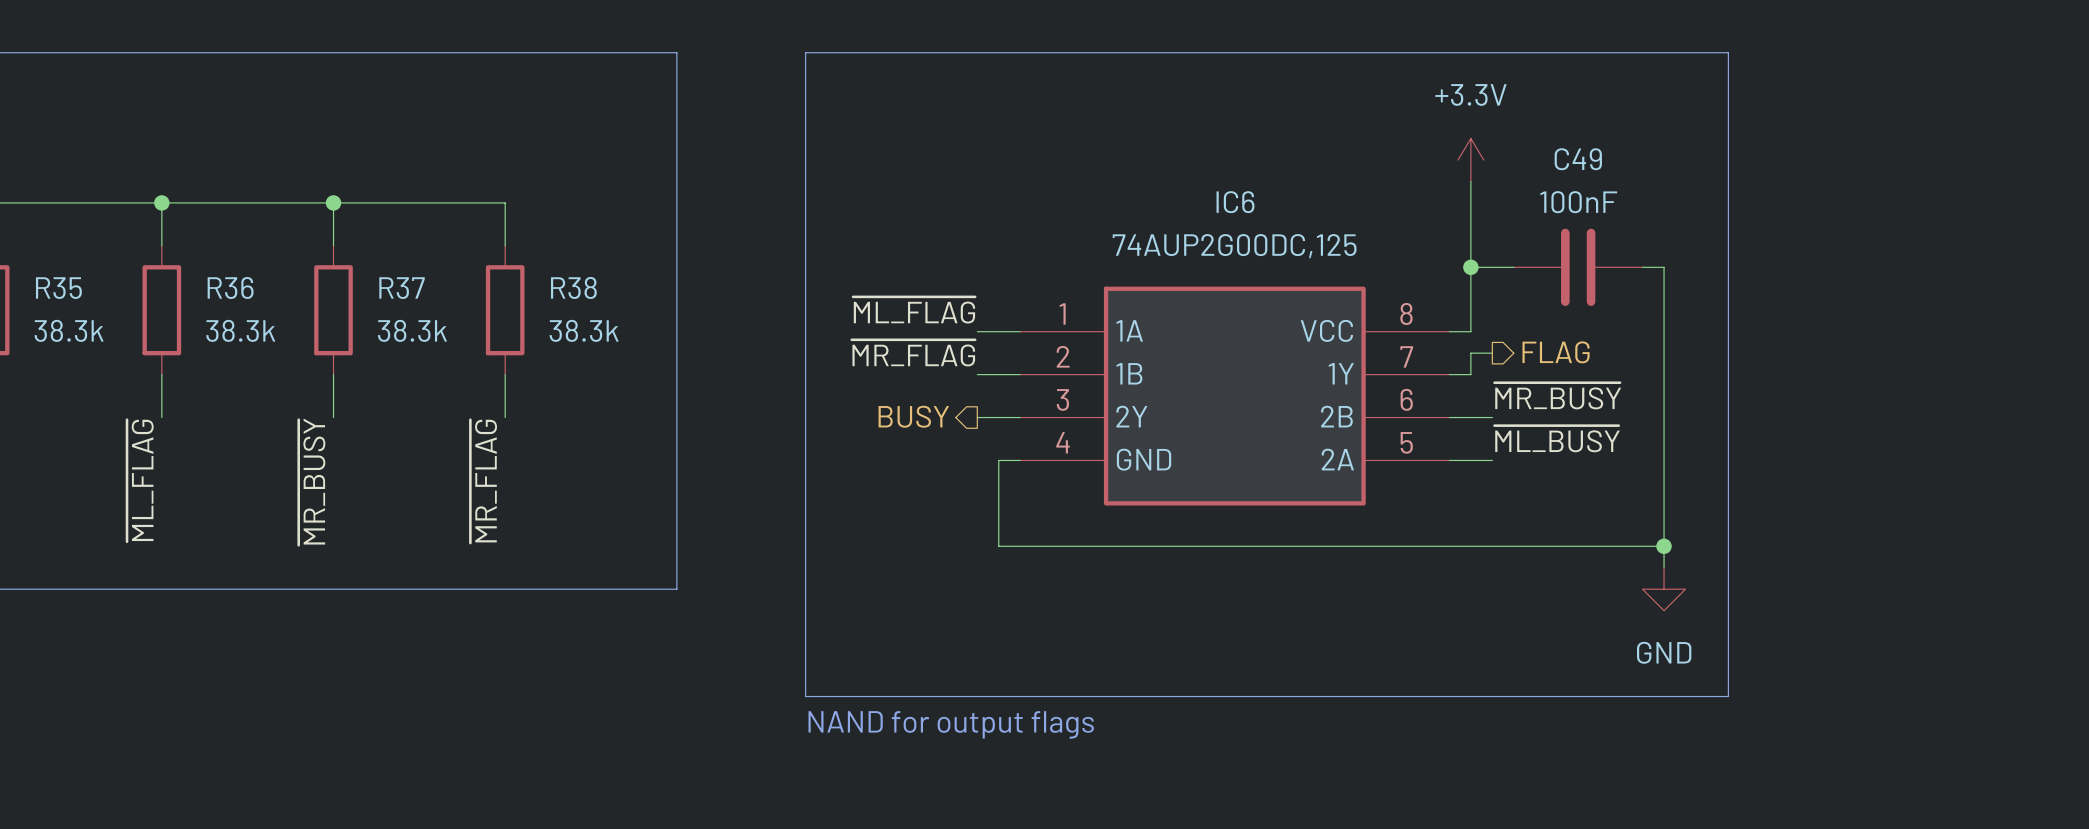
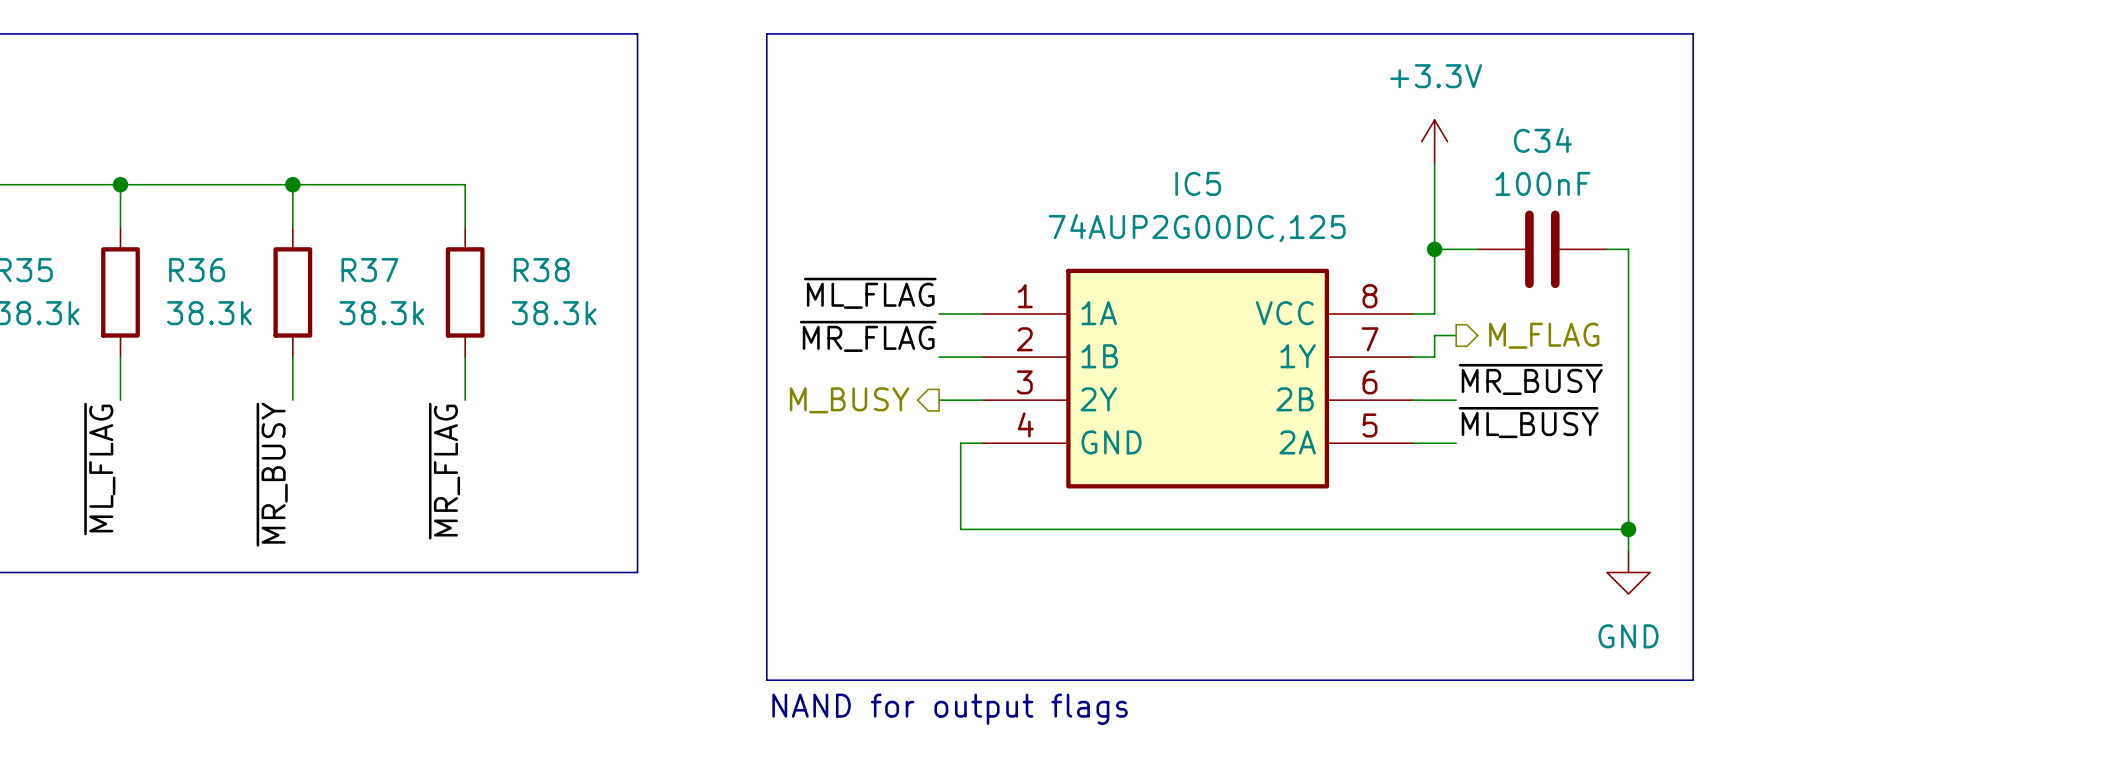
C49 name: C49 (1578, 159) -> C34 (1542, 140)
IC6 name: IC6 (1235, 202) -> IC5 (1198, 183)
hierarchical label: FLAG (1556, 352) -> M_FLAG (1544, 335)
hierarchical label: BUSY (913, 416) -> M_BUSY (849, 400)

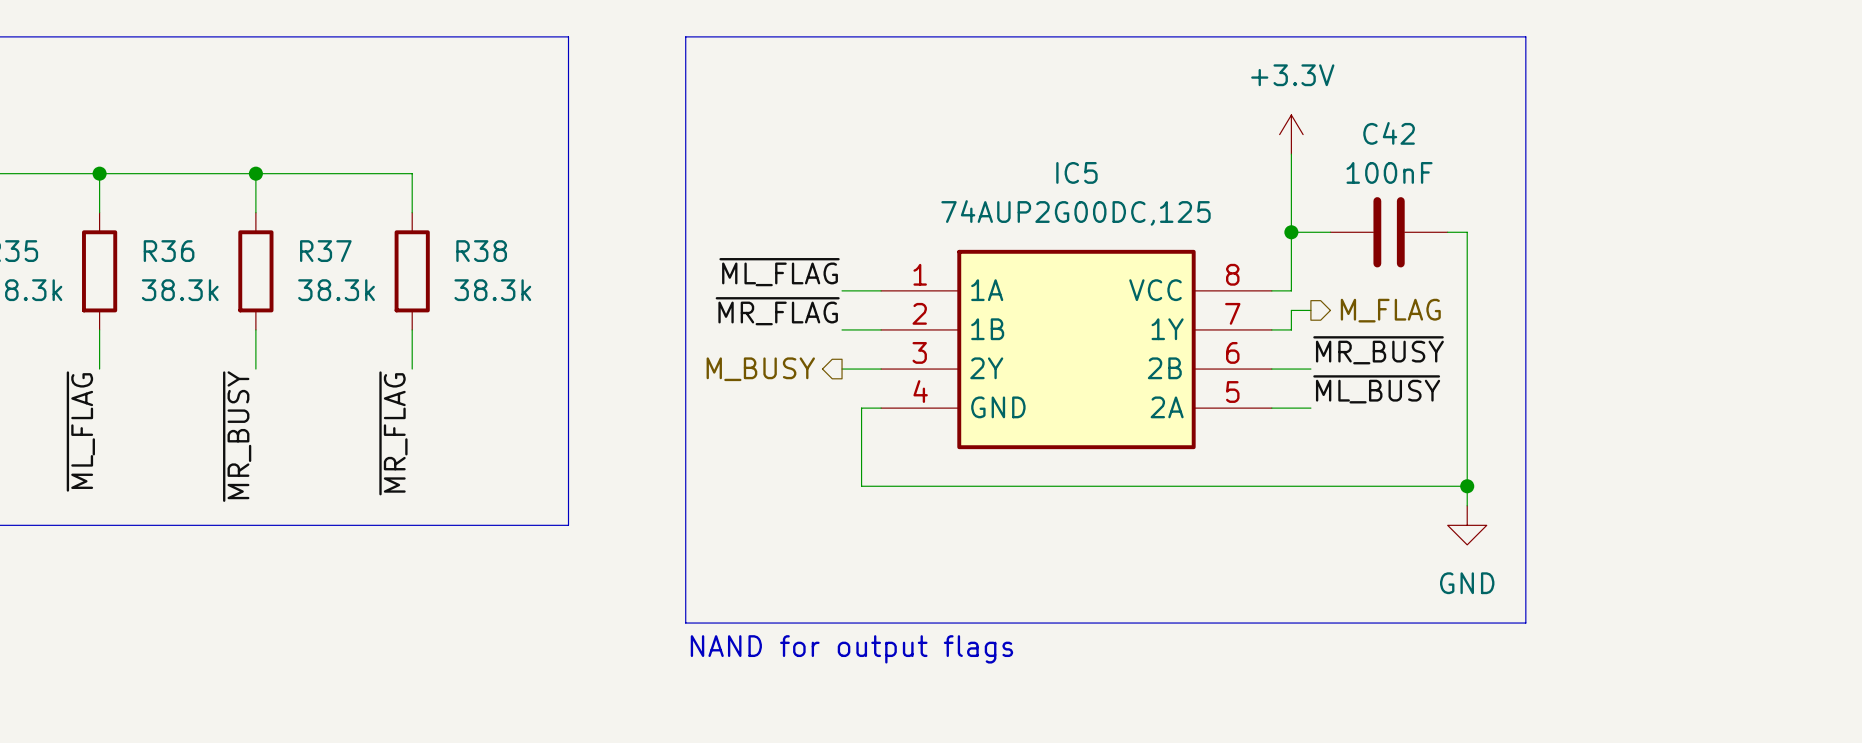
C34 name: C34 (1542, 140) -> C42 (1389, 133)

